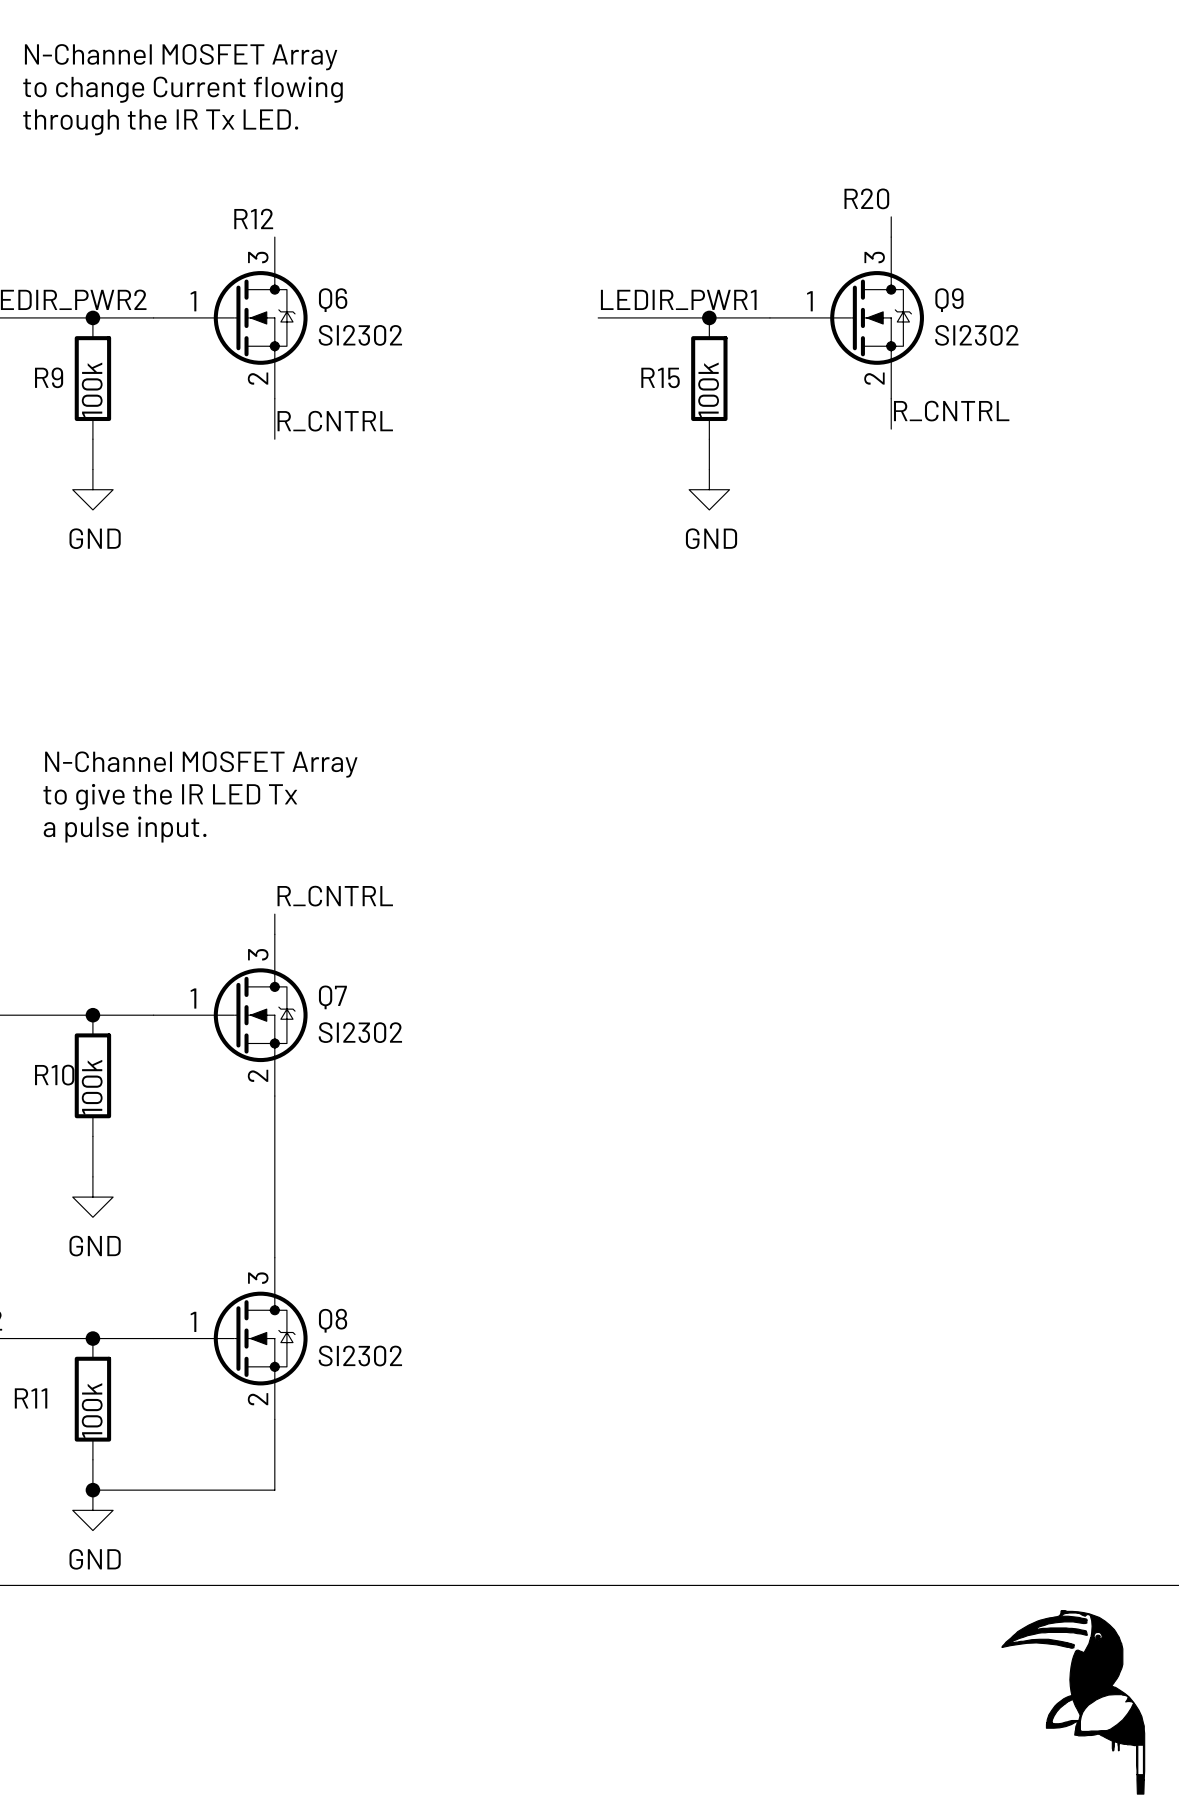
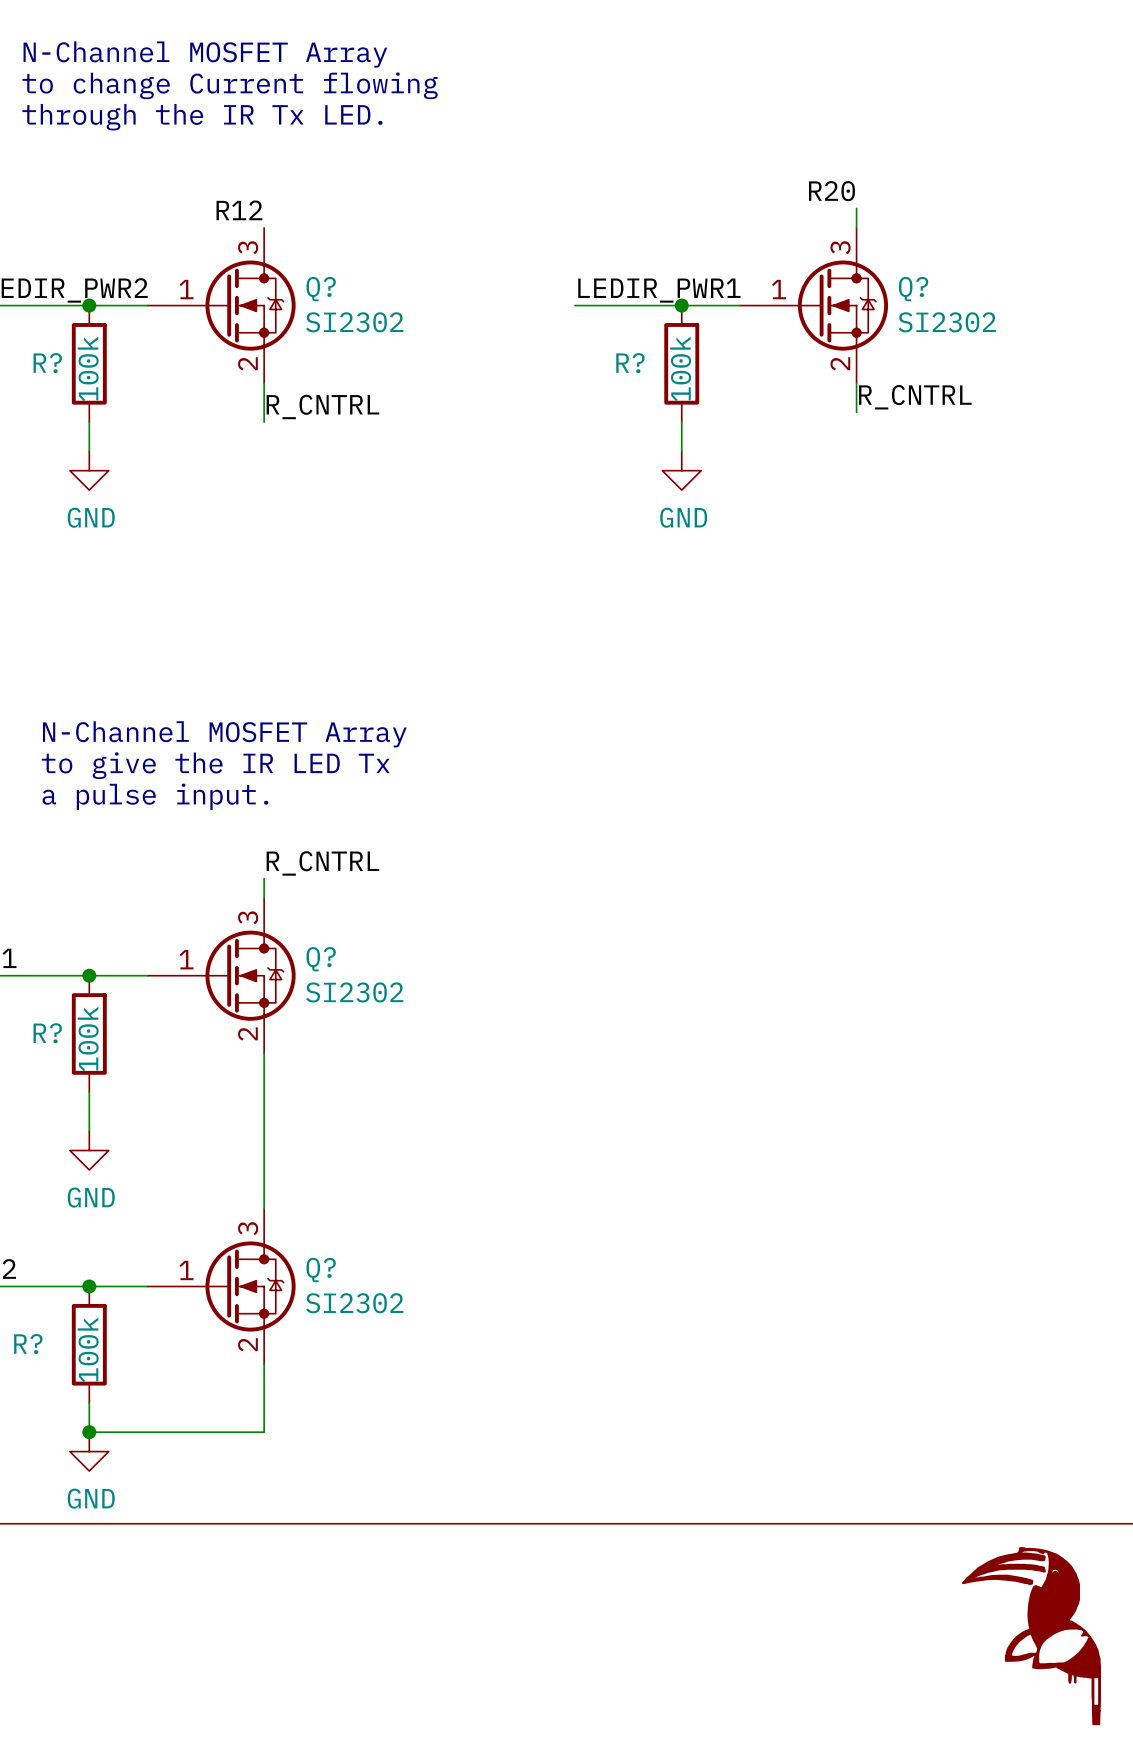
Q6 name: Q6 (333, 300) -> Q? (321, 289)
Q9 name: Q9 (949, 300) -> Q? (913, 289)
R9 name: R9 (49, 377) -> R? (47, 363)
R15 name: R15 (660, 377) -> R? (630, 363)
Q7 name: Q7 (332, 997) -> Q? (321, 959)
R10 name: R10 (54, 1075) -> R? (47, 1033)
Q8 name: Q8 (333, 1320) -> Q? (321, 1270)
R11 name: R11 (31, 1398) -> R? (28, 1344)

